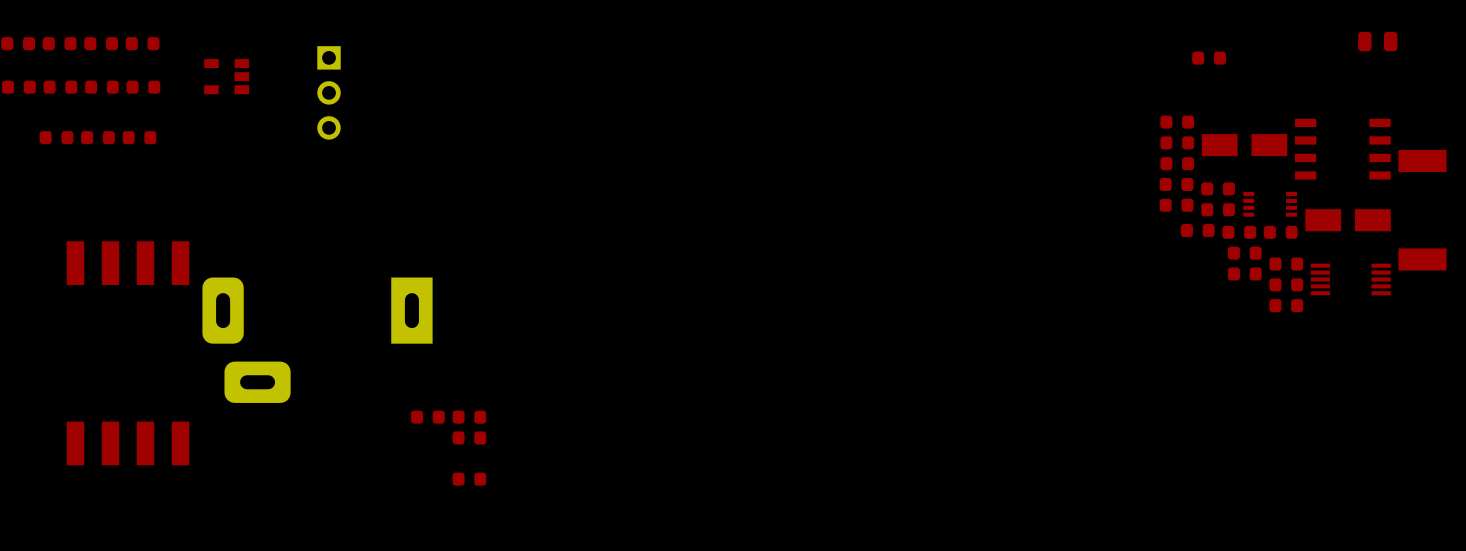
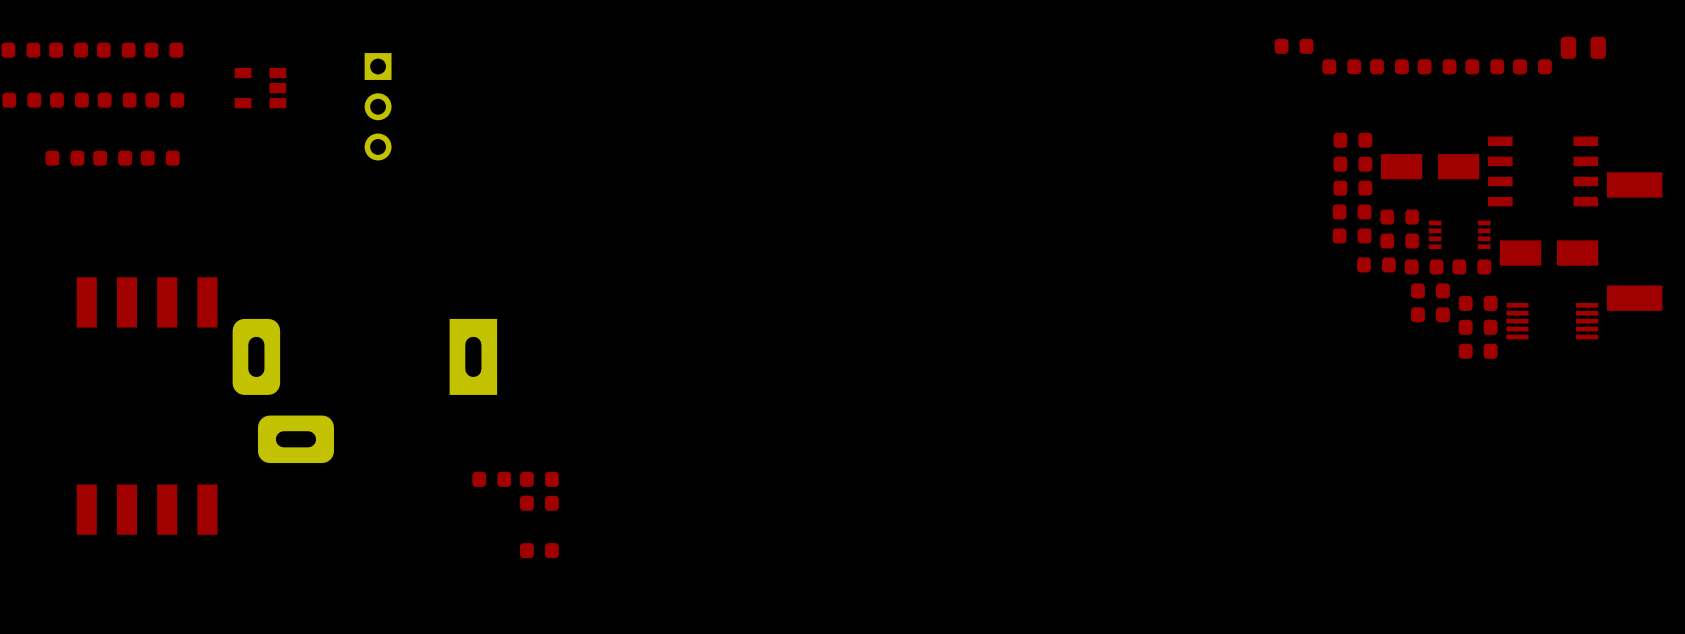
part: none -> (1294, 46)
part: none -> (1341, 66)
part: none -> (1437, 66)
part: none -> (1484, 66)
part: none -> (1532, 66)

